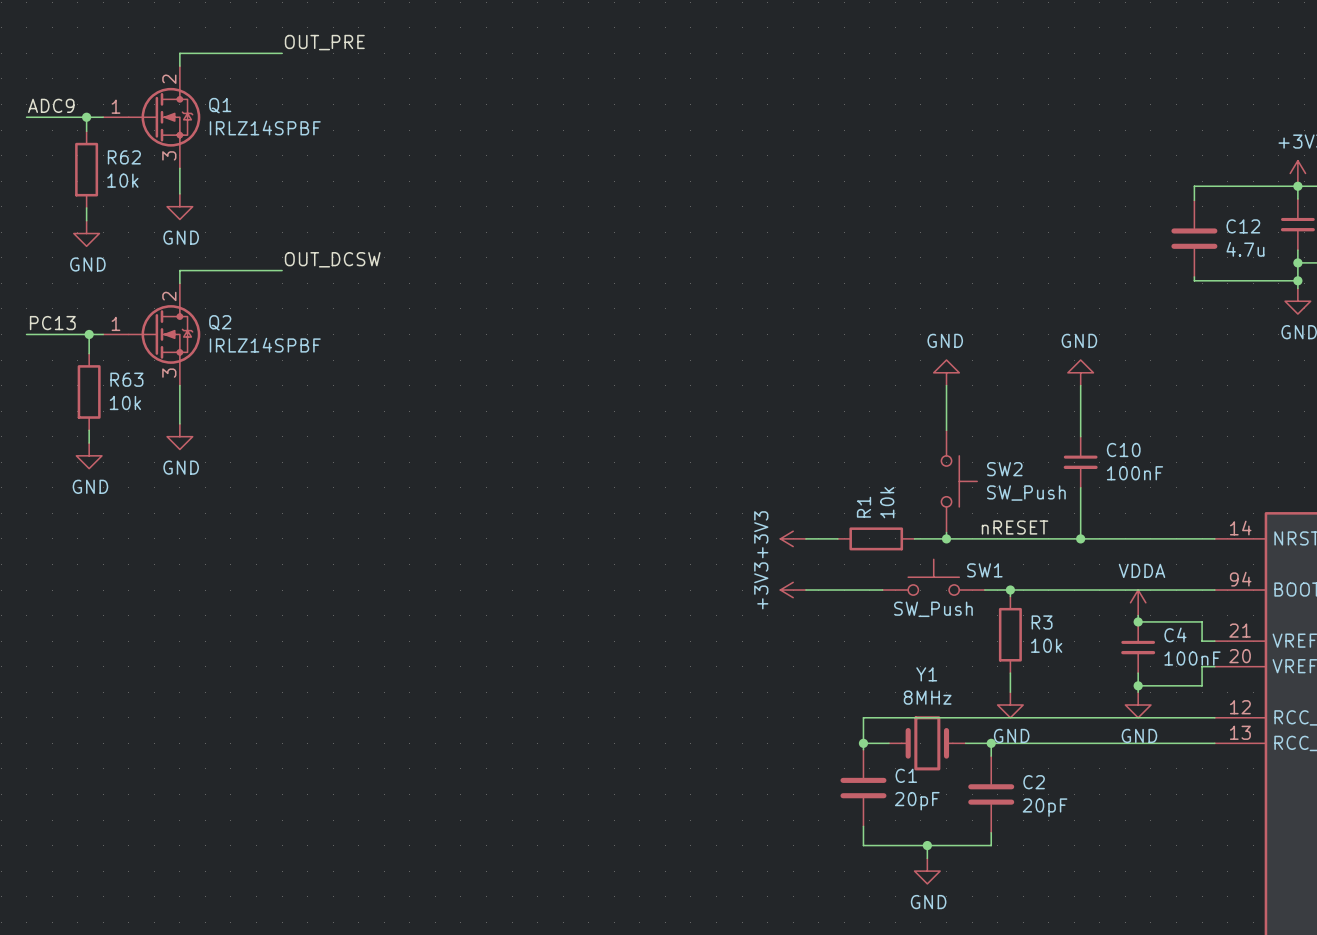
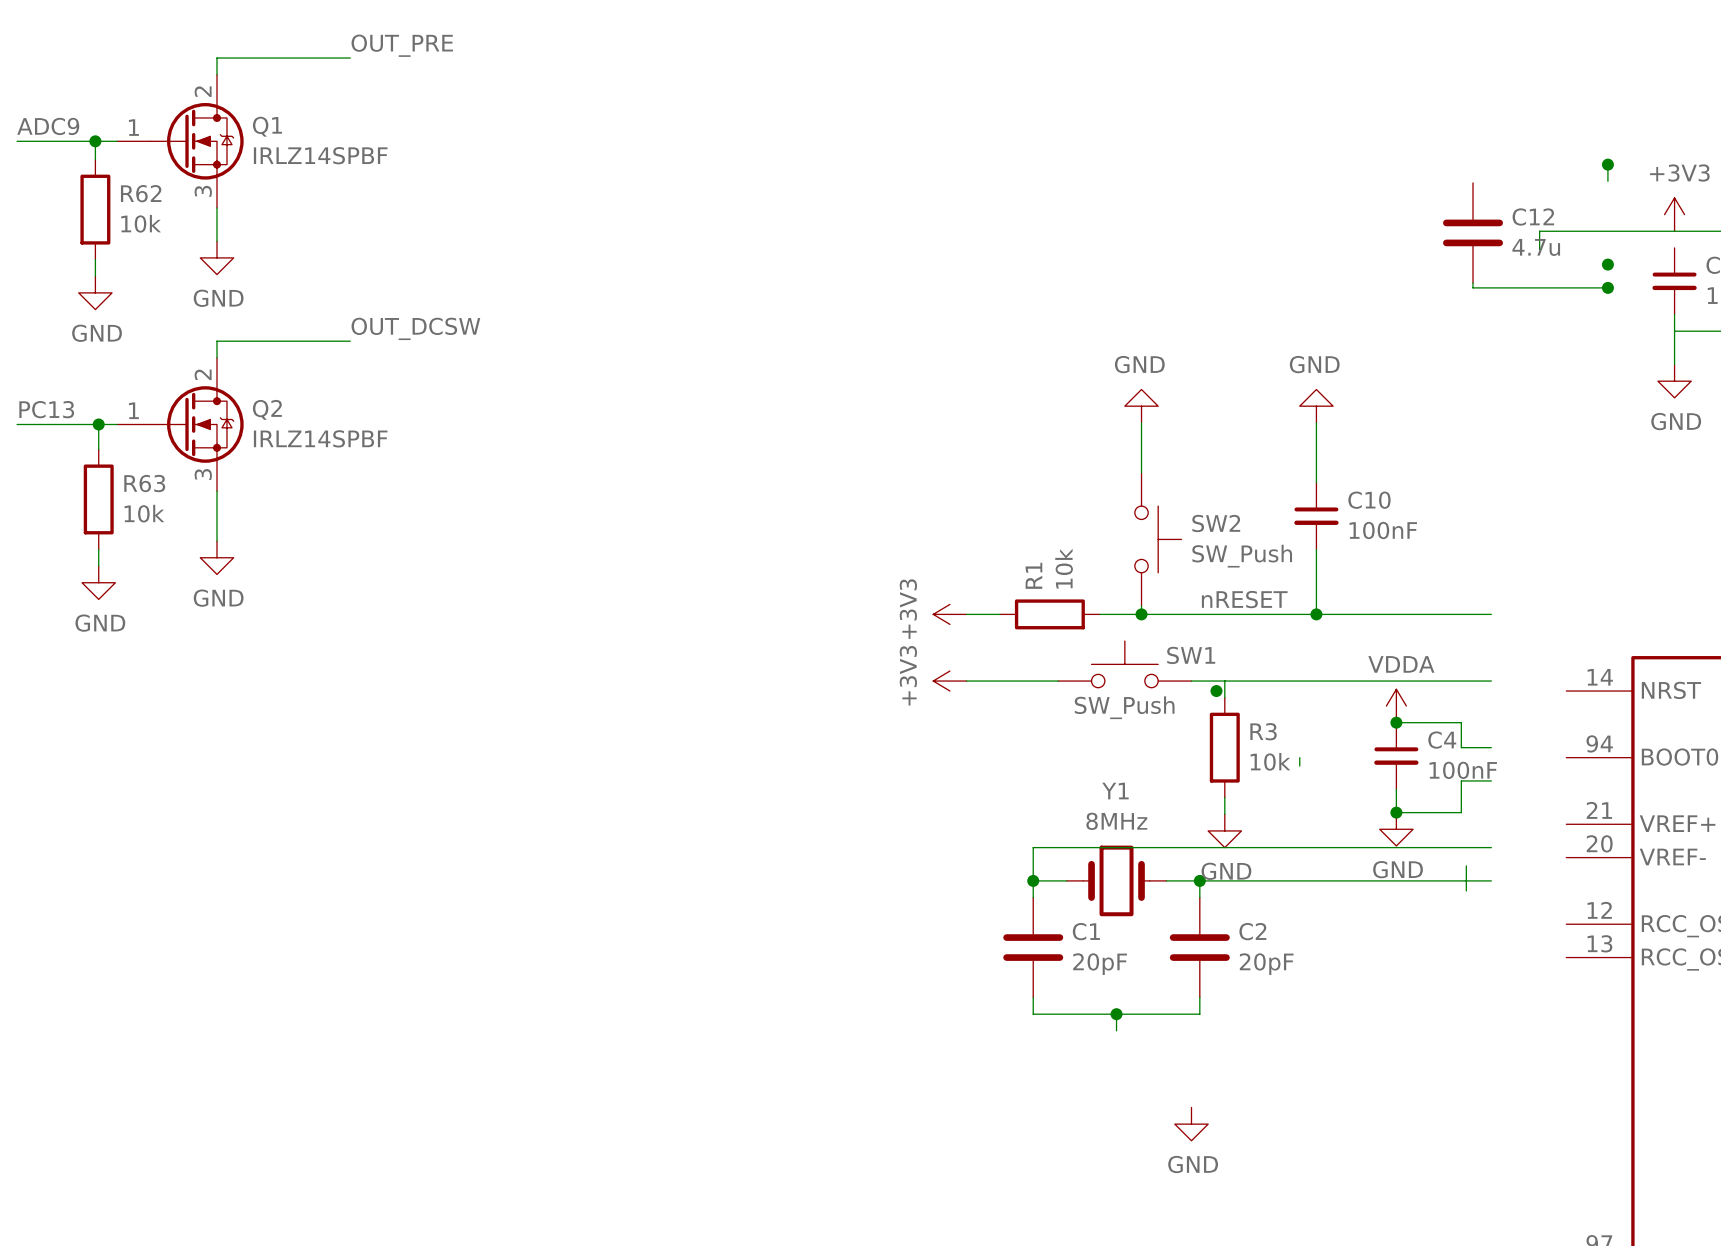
junction: none -> (1607, 164)
wire: (1297, 186) (1297, 199) -> (1607, 164) (1607, 181)
junction: (1297, 186) -> none
junction: none -> (1607, 264)
junction: none -> (1607, 287)
C12 position: (1194, 238) -> (1473, 232)
junction: (1297, 262) -> none
wire: (1194, 276) (1194, 280) (1297, 280) -> (1473, 282) (1473, 287) (1607, 287)
junction: (1297, 280) -> none
power symbol: none -> GND (1141, 406)
power symbol: none -> GND (1316, 406)
wire: none -> (1141, 422) (1141, 472)
wire: none -> (1316, 422) (1316, 482)
power symbol: GND (946, 372) -> none
power symbol: GND (1080, 372) -> none
wire: (946, 385) (946, 430) -> none
wire: (1080, 385) (1080, 436) -> none
wire: none -> (1316, 549) (1316, 614)
C10 position: (1080, 462) -> (1316, 516)
power symbol: none -> +3V3 (949, 614)
wire: none -> (966, 614) (999, 614)
junction: none -> (1141, 614)
junction: none -> (1316, 614)
SW2 position: (959, 481) -> (1158, 539)
wire: (1080, 487) (1080, 538) -> none
label position: nRESET (1015, 527) -> nRESET (1244, 599)
power symbol: none -> +3V3 (949, 681)
wire: none -> (966, 681) (1058, 681)
wire: none -> (1224, 681) (1224, 697)
power symbol: +3V3 (793, 538) -> none
wire: (805, 538) (837, 538) -> none
R1 position: (876, 538) -> (1049, 614)
wire: (914, 538) (1214, 538) -> (1099, 614) (1491, 614)
junction position: (1080, 538) -> (1396, 722)
wire: none -> (1396, 722) (1461, 722) (1461, 747) (1491, 747)
SW1 position: (933, 577) -> (1124, 664)
power symbol: +3V3 (793, 590) -> none
wire: (805, 590) (882, 590) -> none
wire: (984, 590) (1214, 590) -> (1191, 681) (1491, 681)
junction: (1010, 590) -> none
power symbol position: VDDA (1138, 602) -> VDDA (1396, 706)
wire: none -> (1491, 780) (1461, 780) (1461, 812) (1396, 812) (1396, 789)
wire: (1138, 615) (1138, 621) (1202, 621) (1202, 641) (1214, 641) -> none
wire: none -> (1224, 797) (1224, 814)
junction: (1138, 621) -> none
junction: none -> (1396, 812)
R3 position: (1010, 634) -> (1224, 747)
power symbol: none -> GND (1396, 829)
power symbol: none -> GND (1224, 830)
C4 position: (1138, 647) -> (1396, 755)
wire: none -> (1491, 847) (1033, 847) (1033, 897)
wire: (1214, 666) (1202, 666) (1202, 685) (1138, 685) -> none
wire: (1010, 673) (1010, 692) -> none
junction: none -> (1033, 880)
junction: none -> (1199, 880)
junction: (1138, 685) -> none
power symbol: GND (1010, 705) -> none
power symbol: GND (1138, 705) -> none
wire: (1214, 717) (863, 717) (863, 749) -> none
wire: (863, 743) (889, 743) -> (1033, 880) (1066, 880)
junction: (863, 743) -> none
Y1 position: (927, 743) -> (1116, 880)
wire: (965, 743) (1214, 743) -> (1166, 880) (1491, 880)
junction: (991, 743) -> none
wire: none -> (1033, 997) (1033, 1014) (1199, 1014) (1199, 997)
junction: none -> (1116, 1014)
C1 position: (863, 788) -> (1033, 947)
C2 position: (991, 794) -> (1199, 947)
wire: (863, 826) (863, 845) (991, 845) (991, 832) -> none
wire: (927, 845) (927, 858) -> (1116, 1014) (1116, 1030)
junction: (927, 845) -> none

